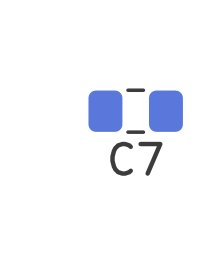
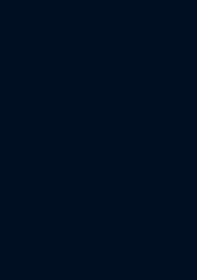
C7: (135, 111) -> none

